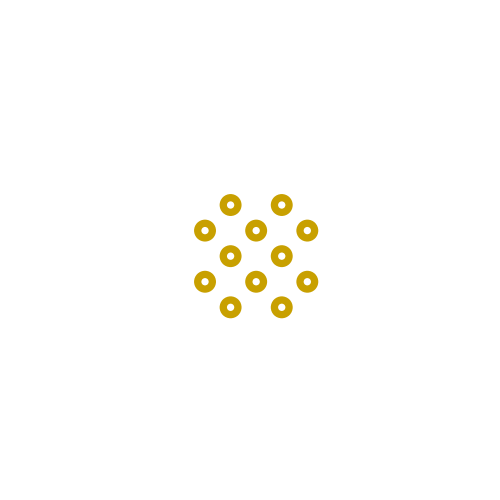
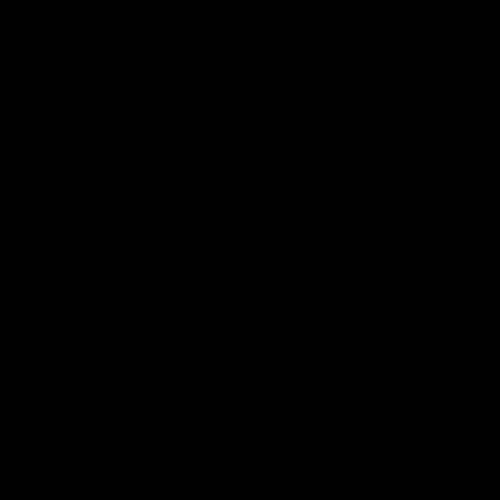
part: (256, 256) -> none

